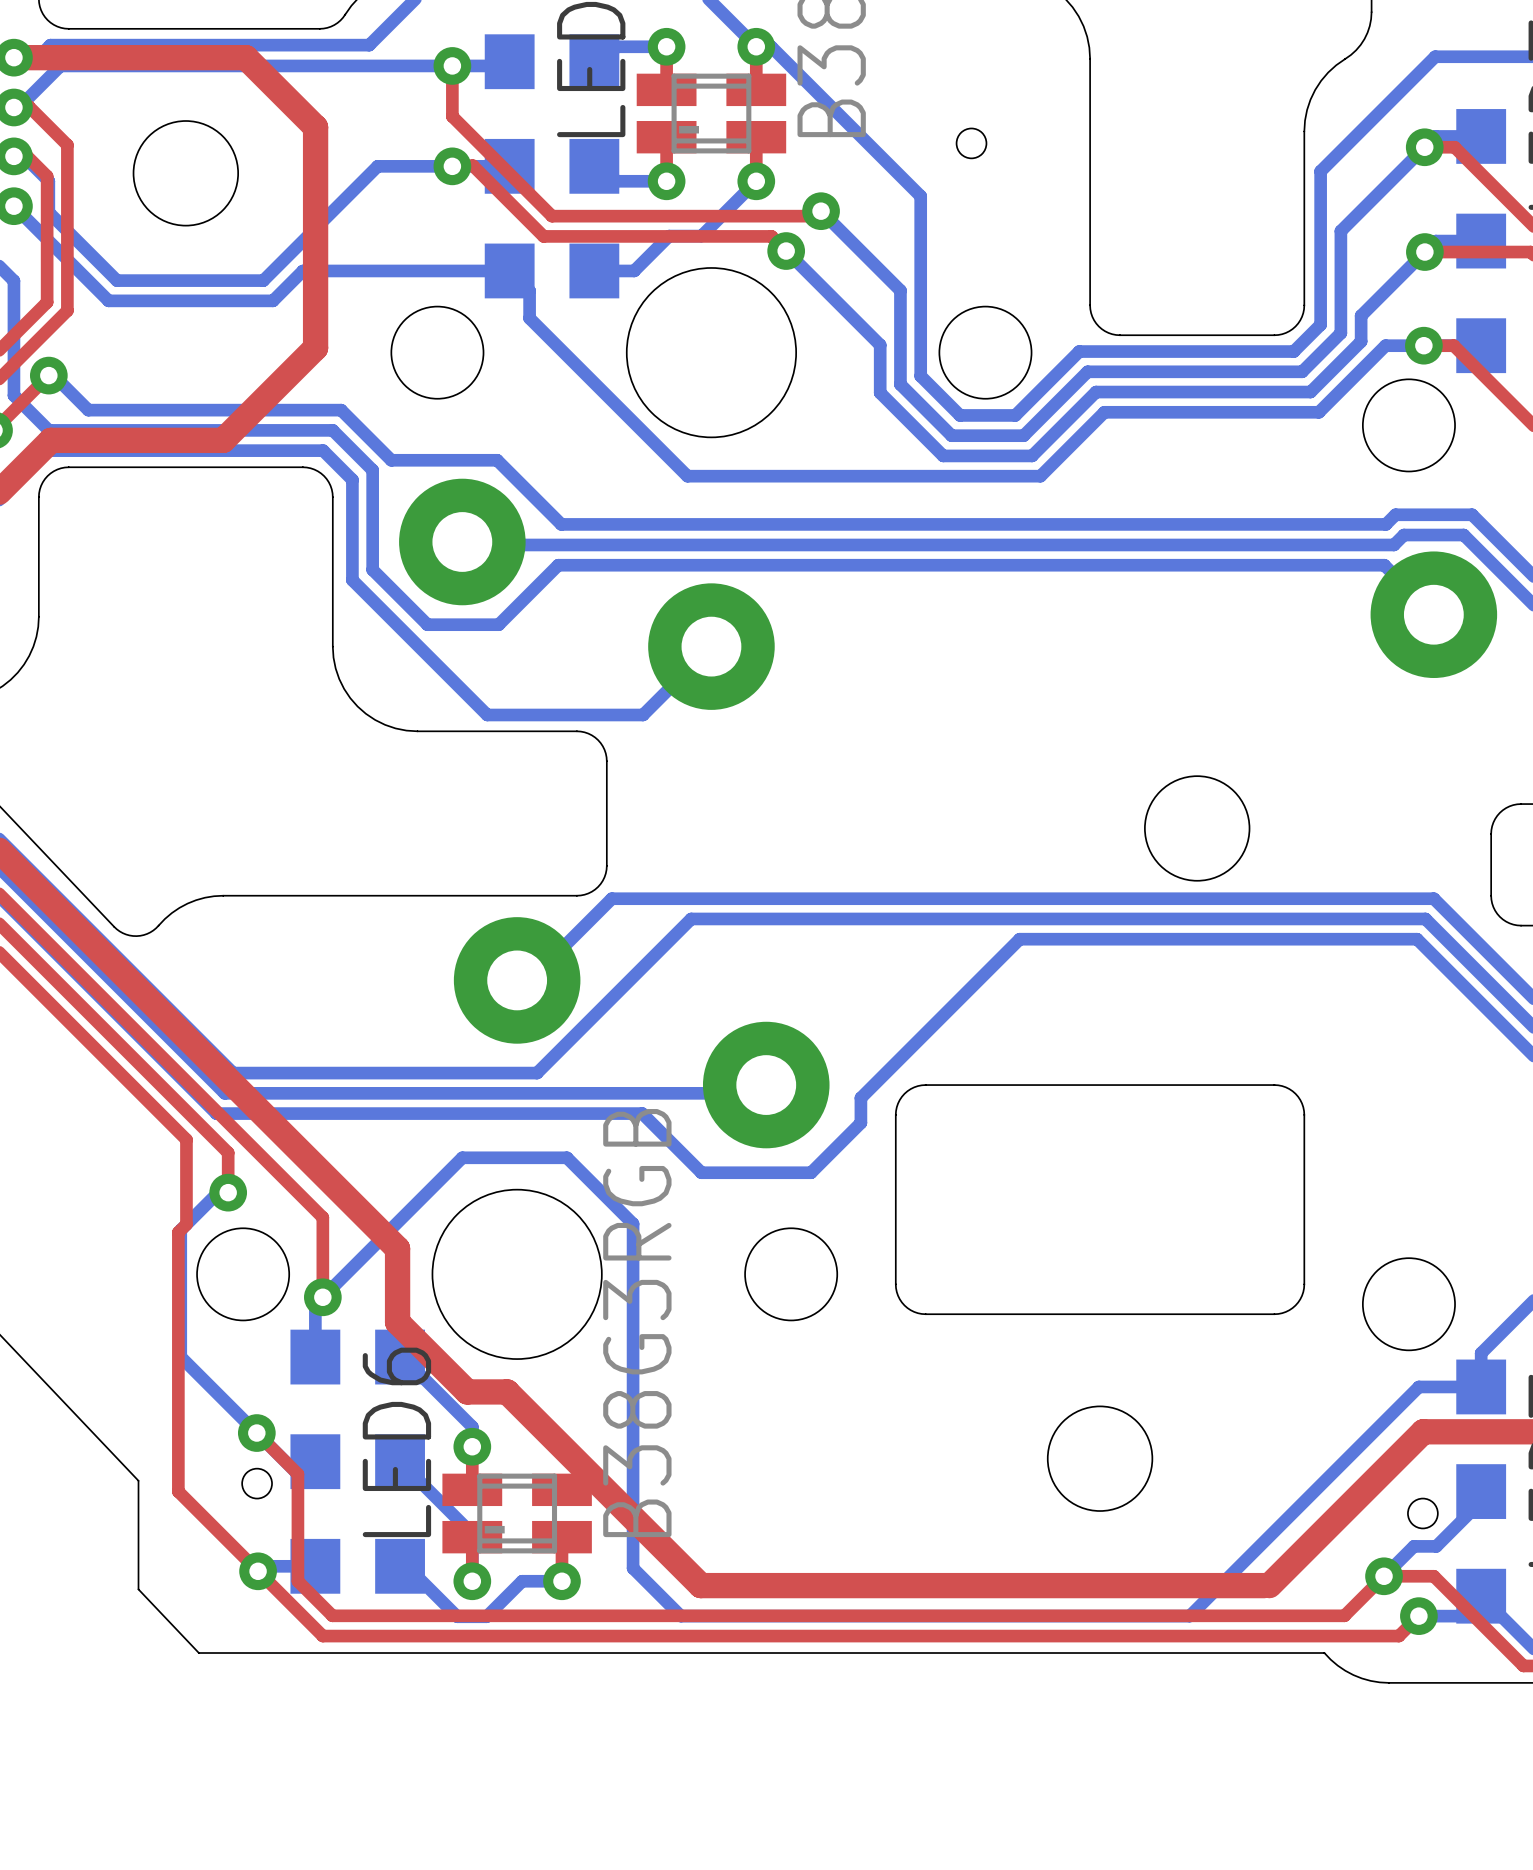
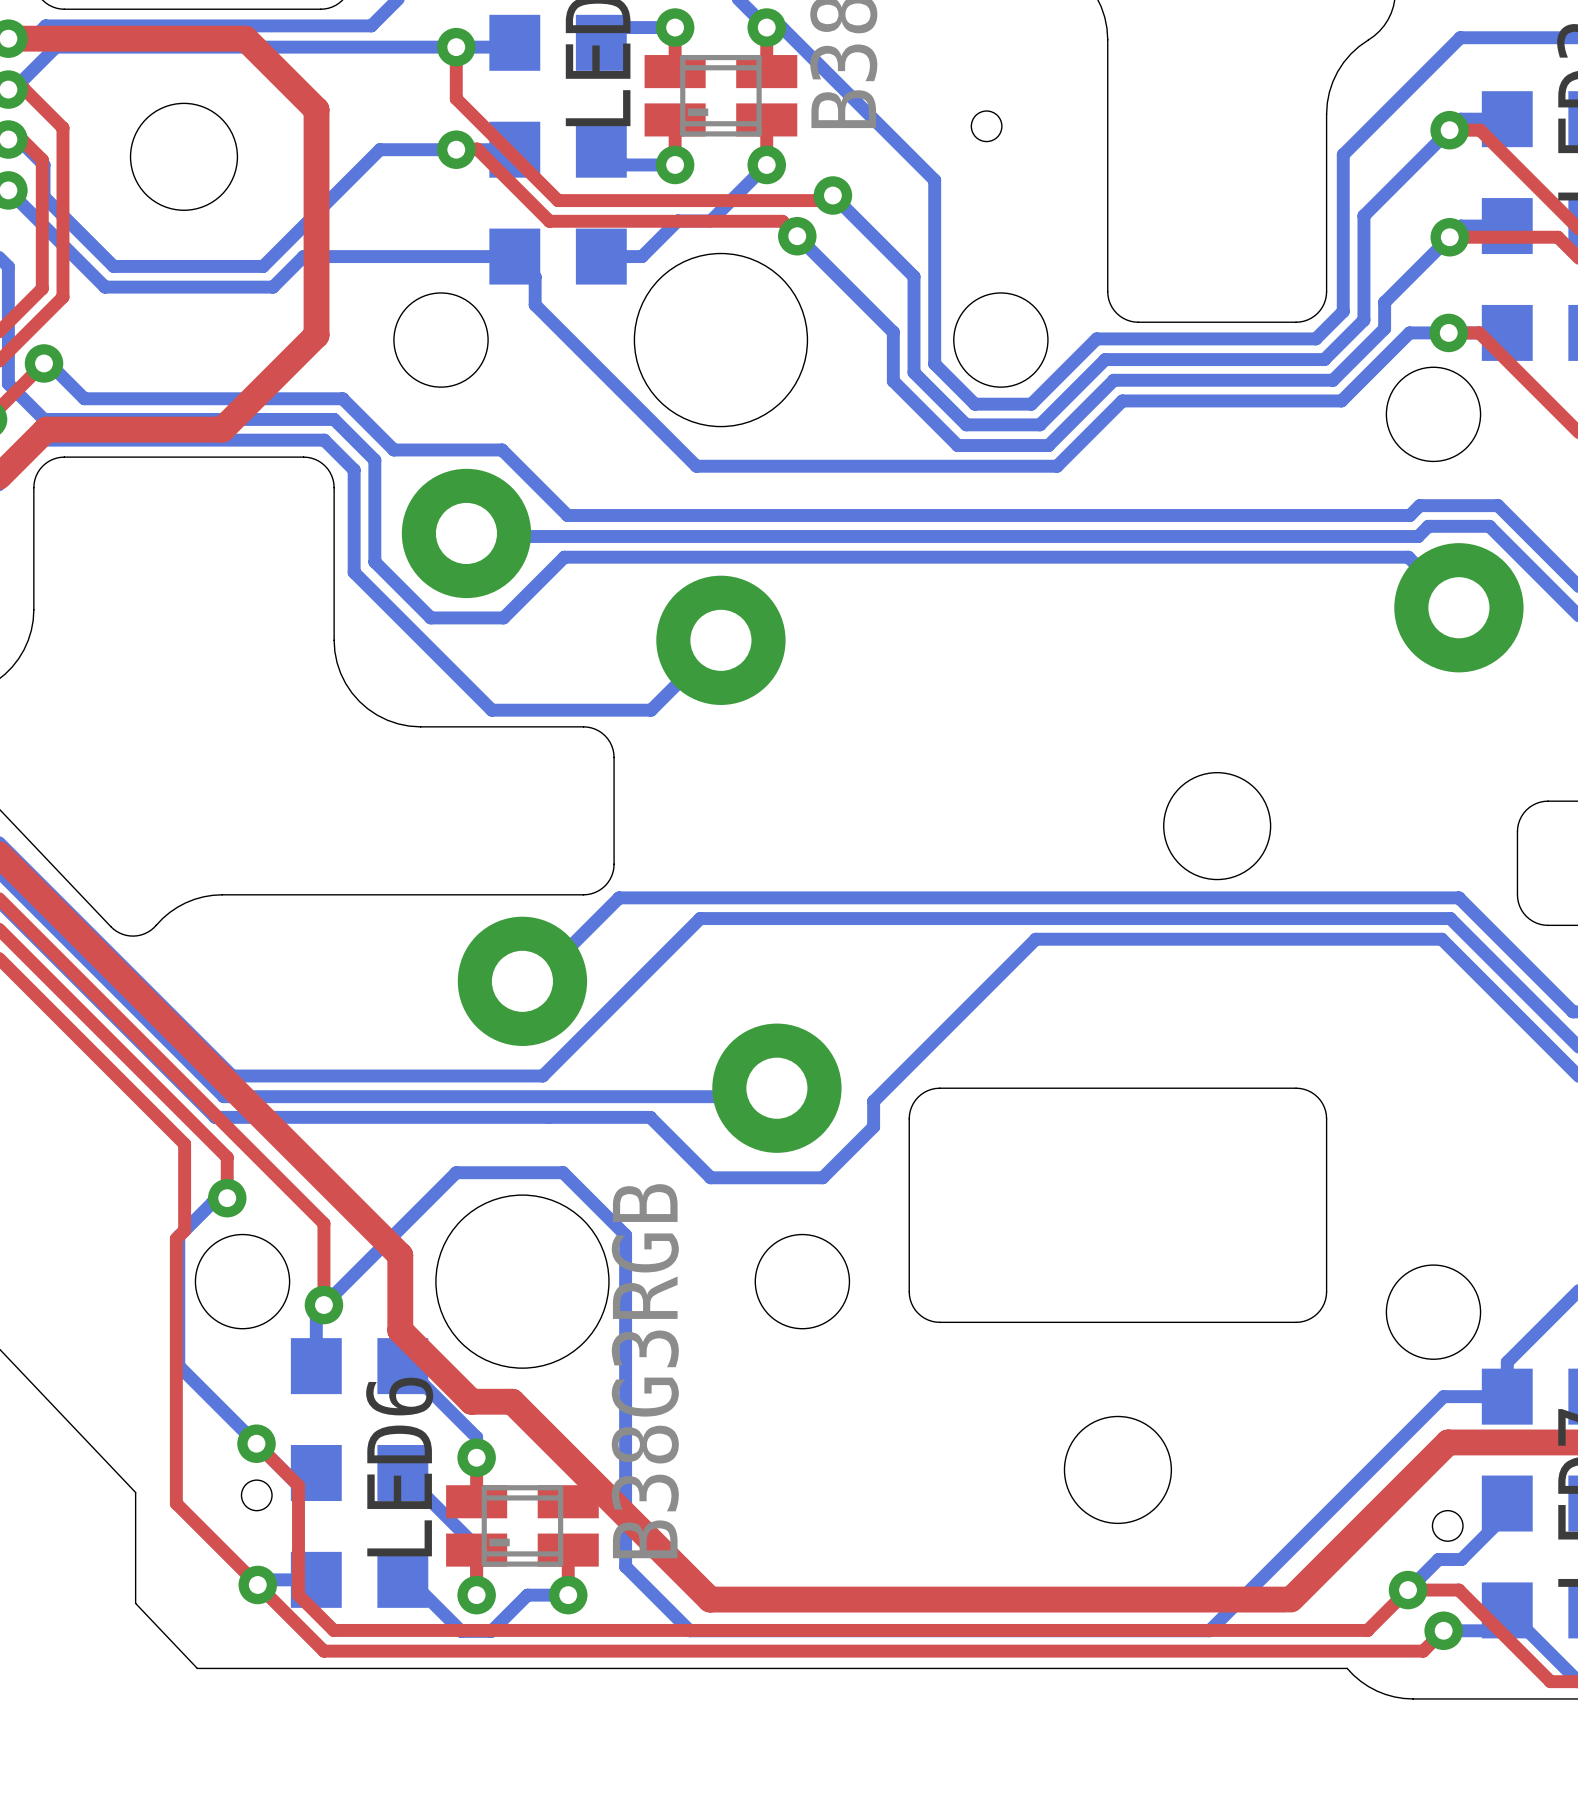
bottom track: (452, 1167) (462, 1157) (566, 1157) (633, 1223) (633, 1568) -> (456, 1172) (563, 1172) (625, 1235) (625, 1566) (640, 1581)

